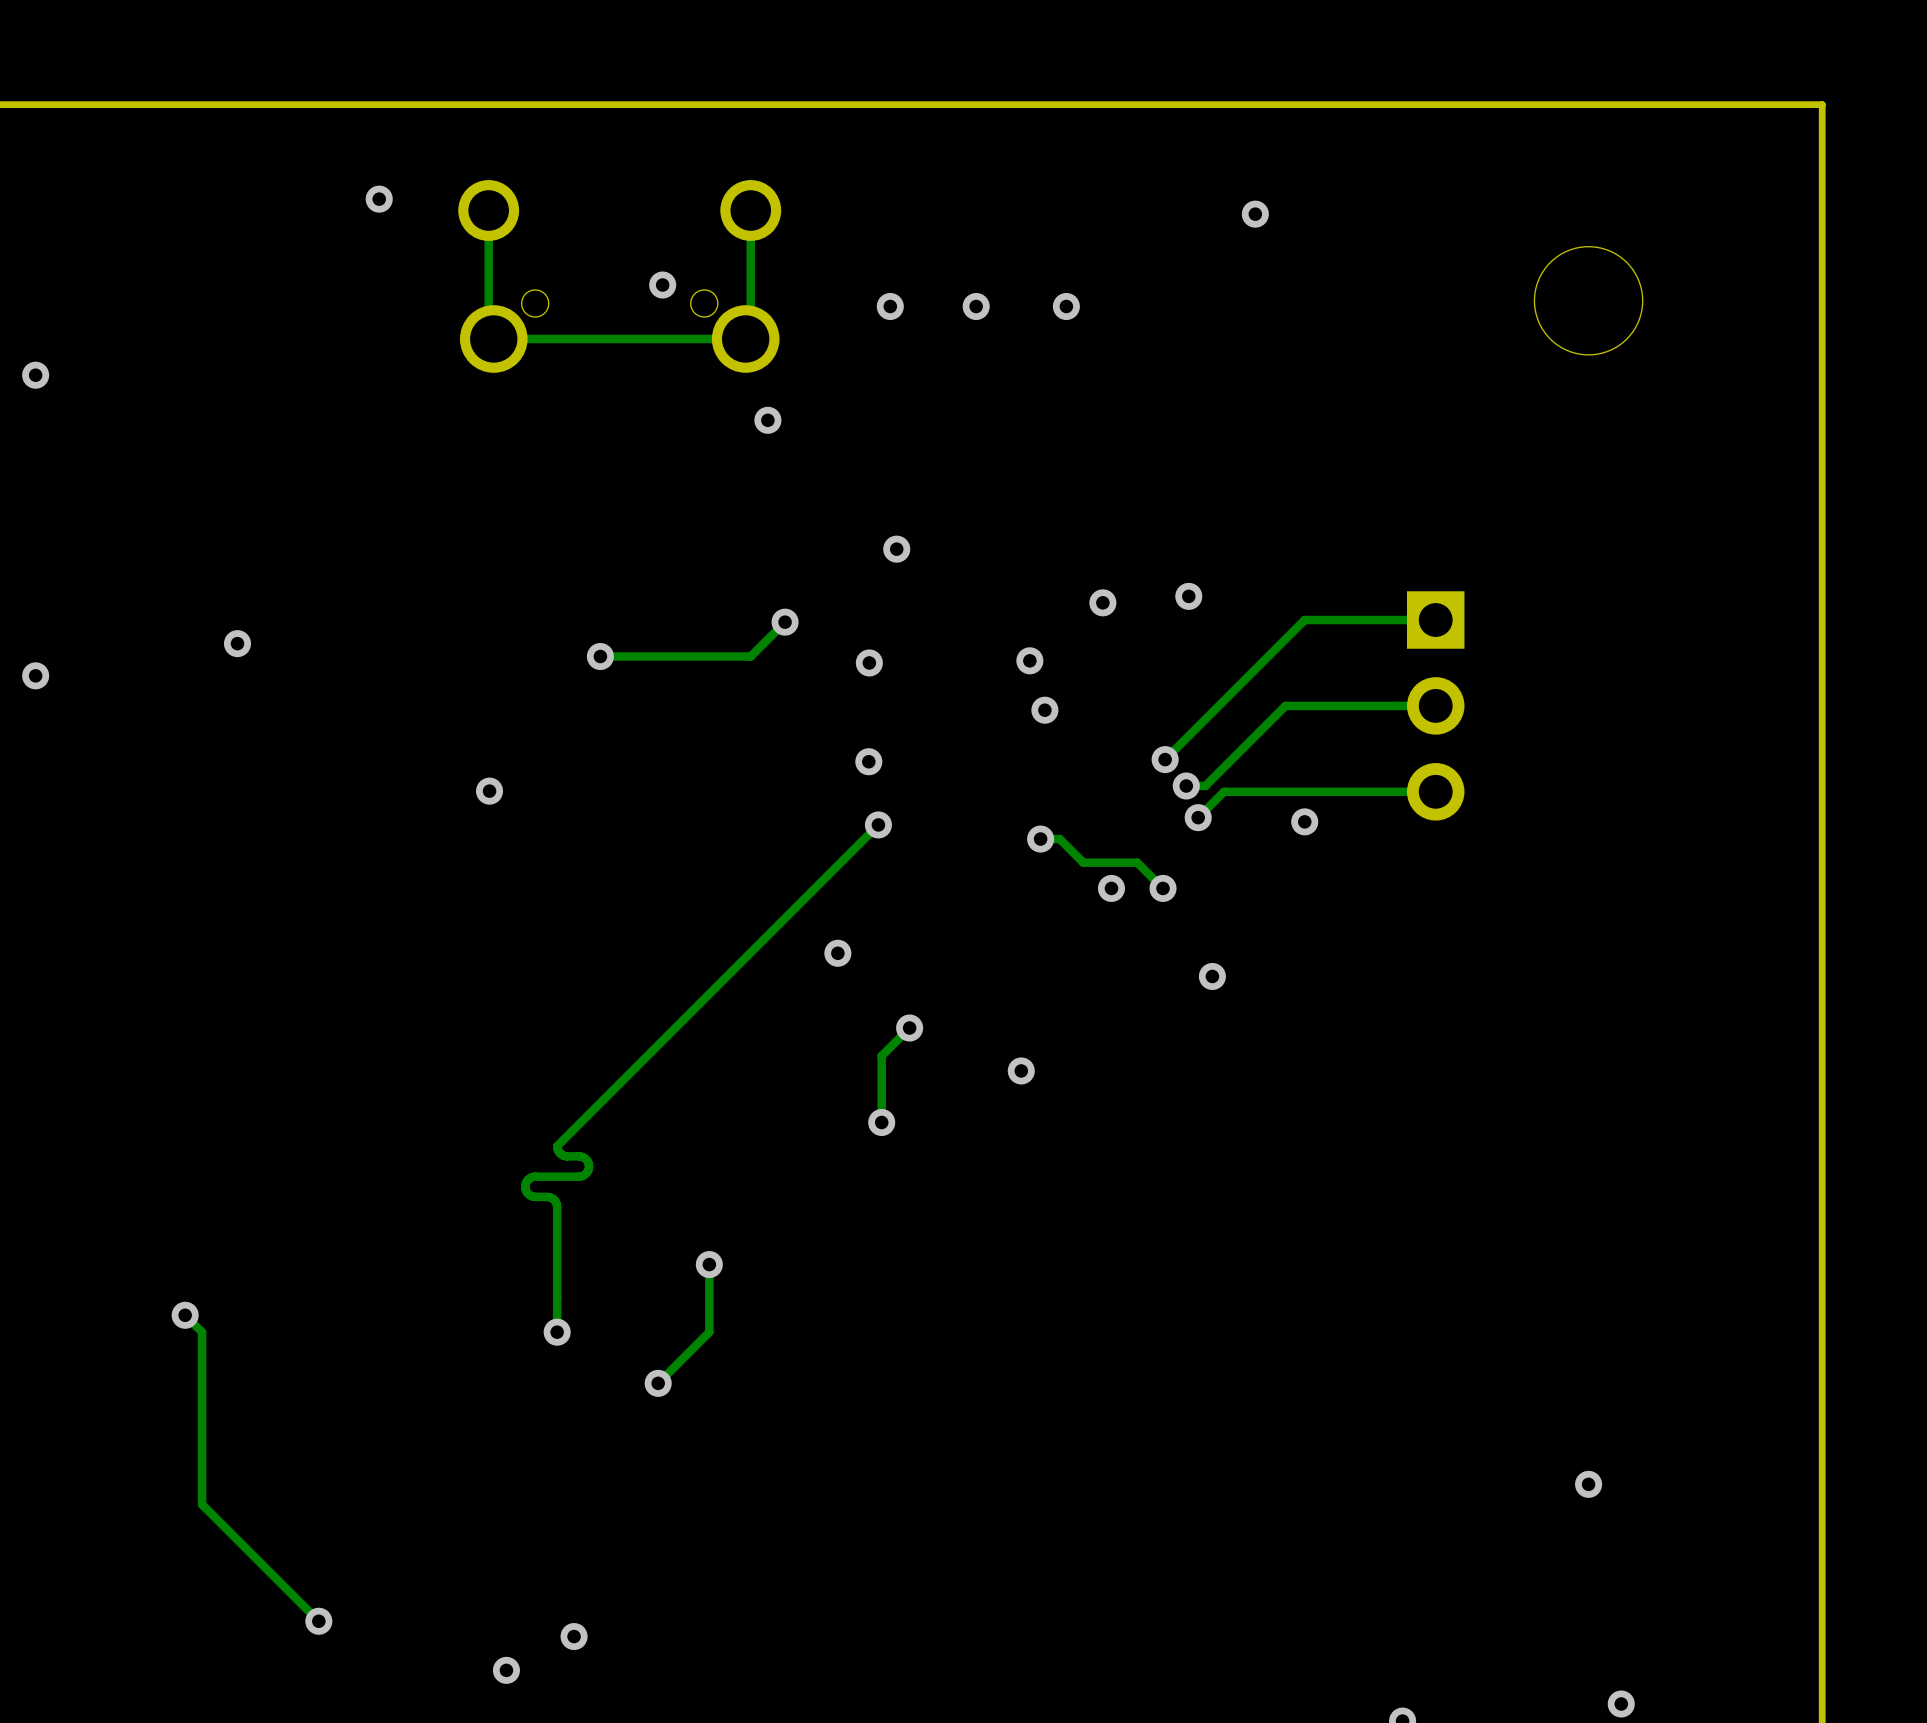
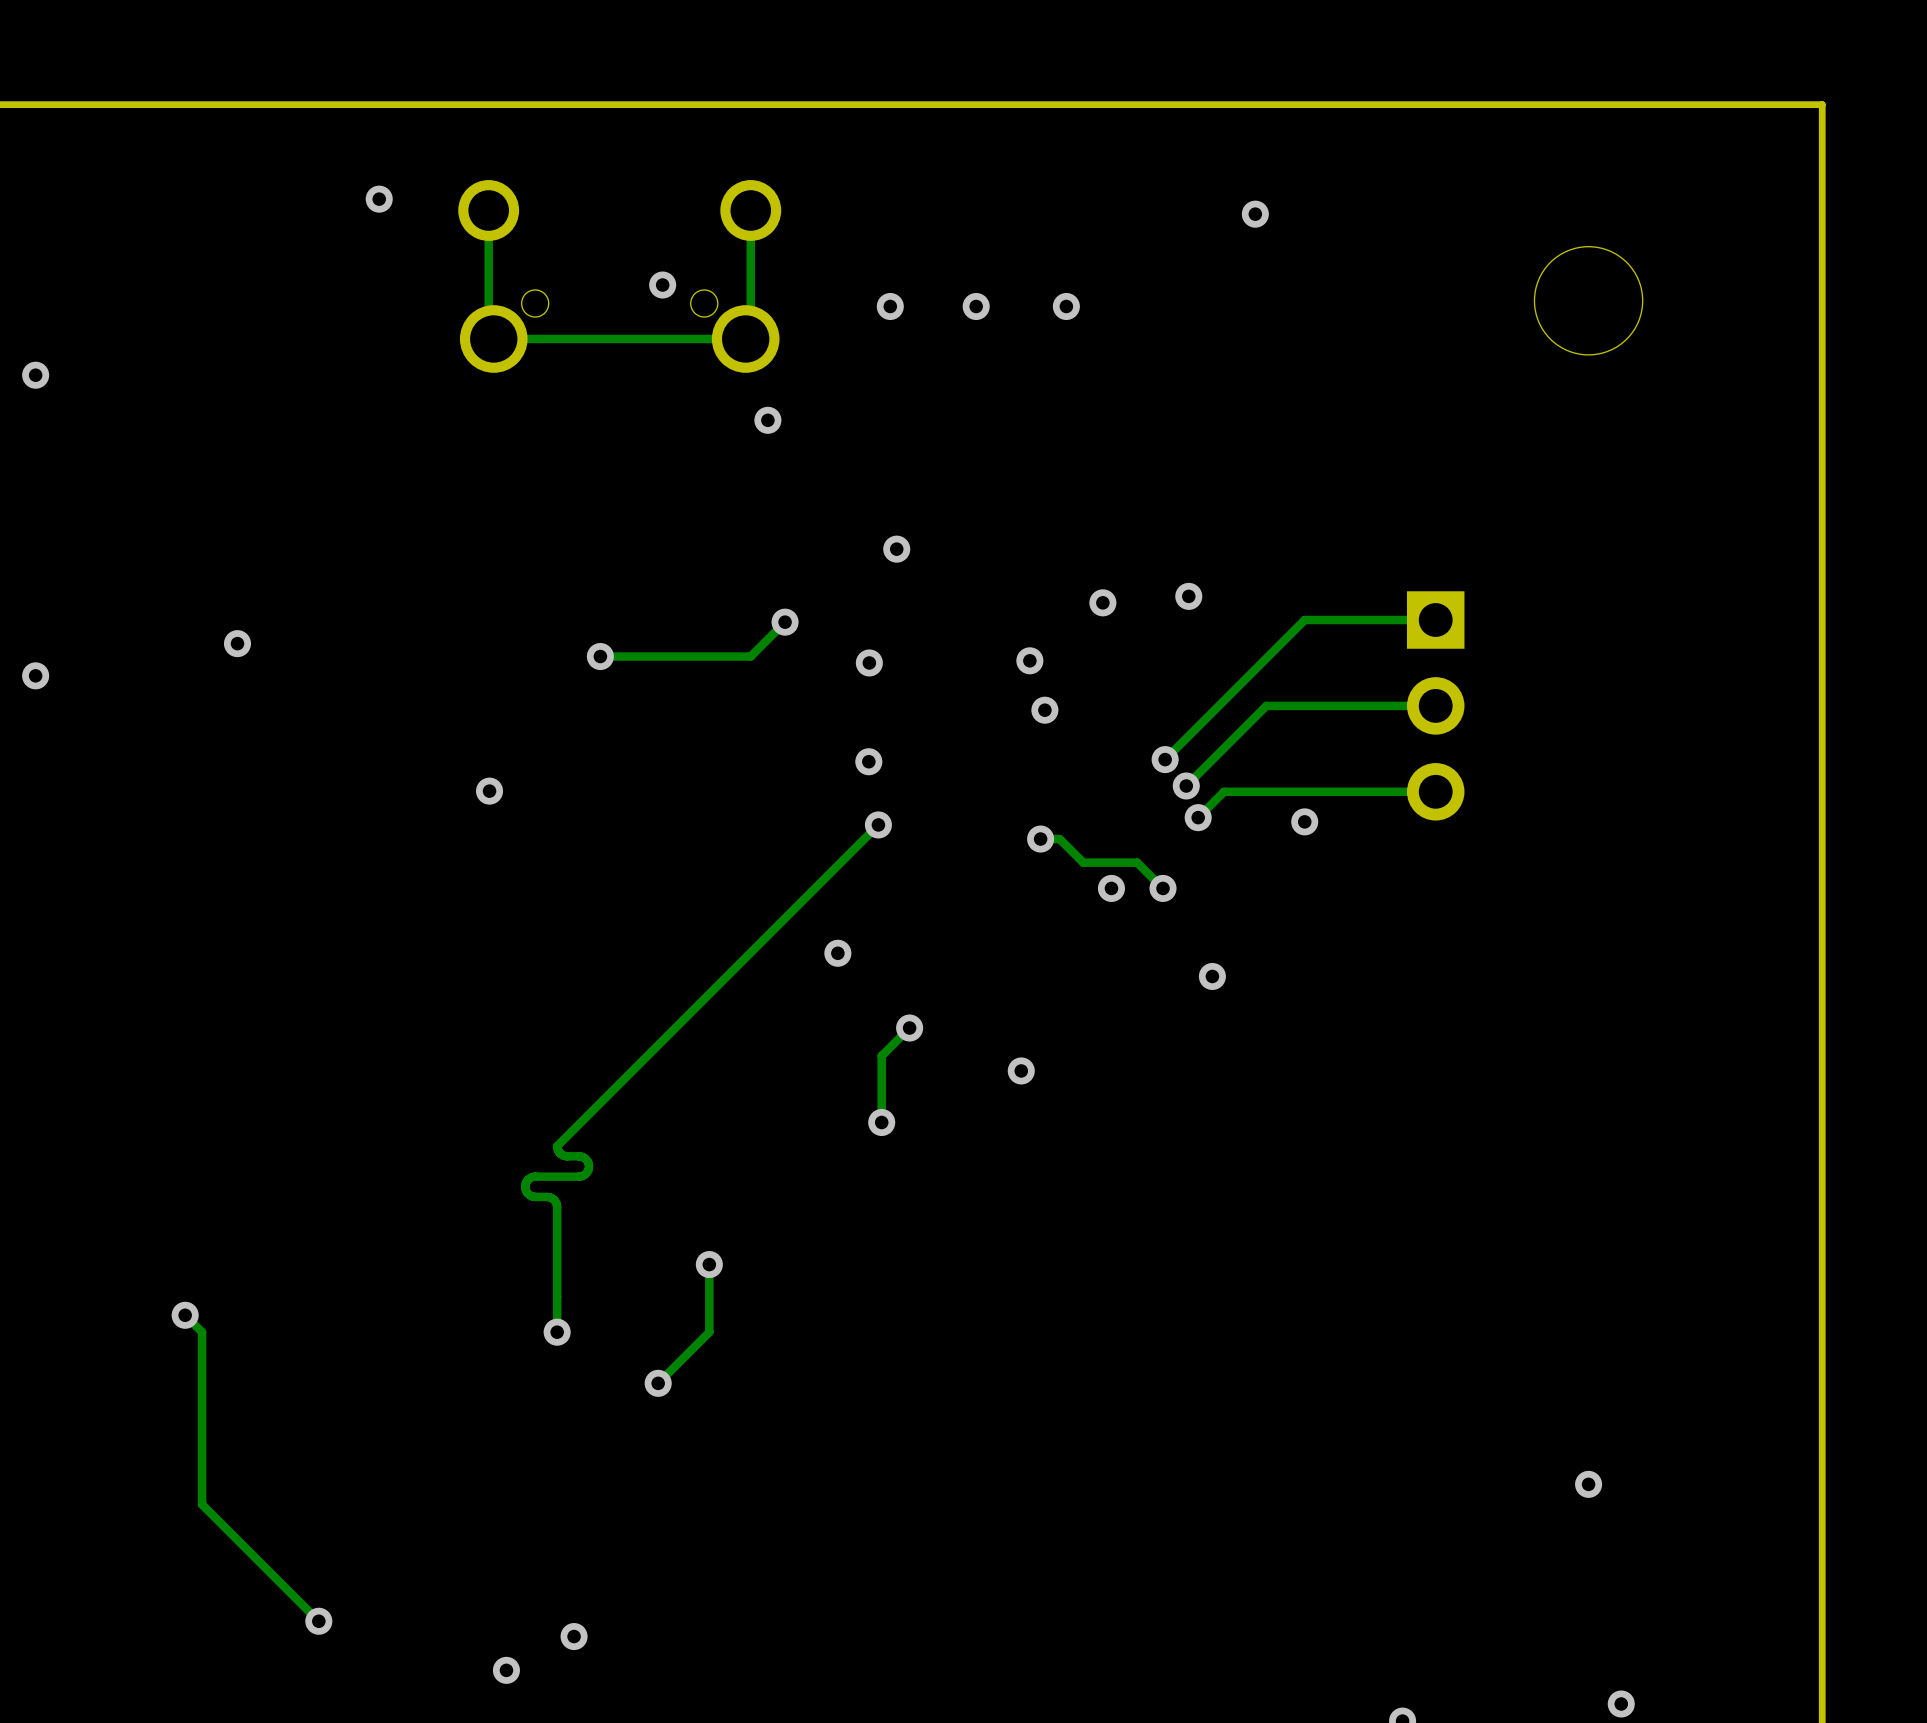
track: (1285, 705) (1205, 785) (1186, 785) -> (1285, 705) (1266, 705) (1186, 785)

